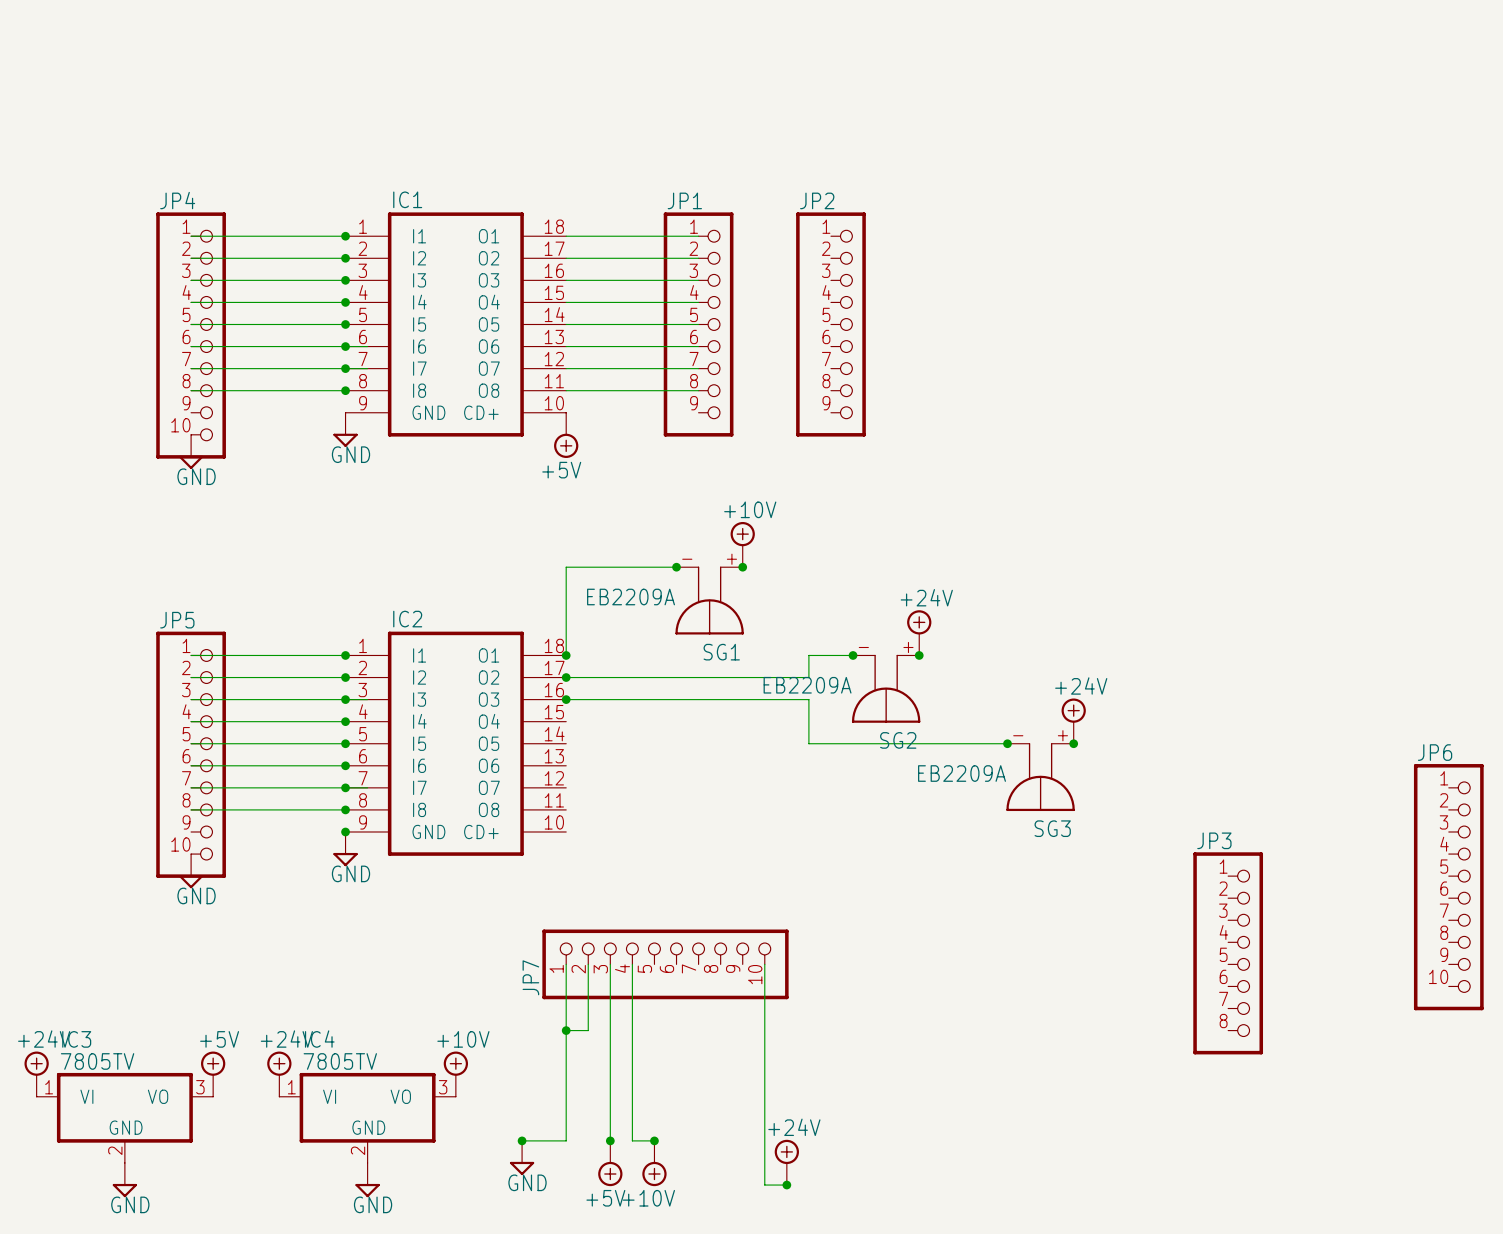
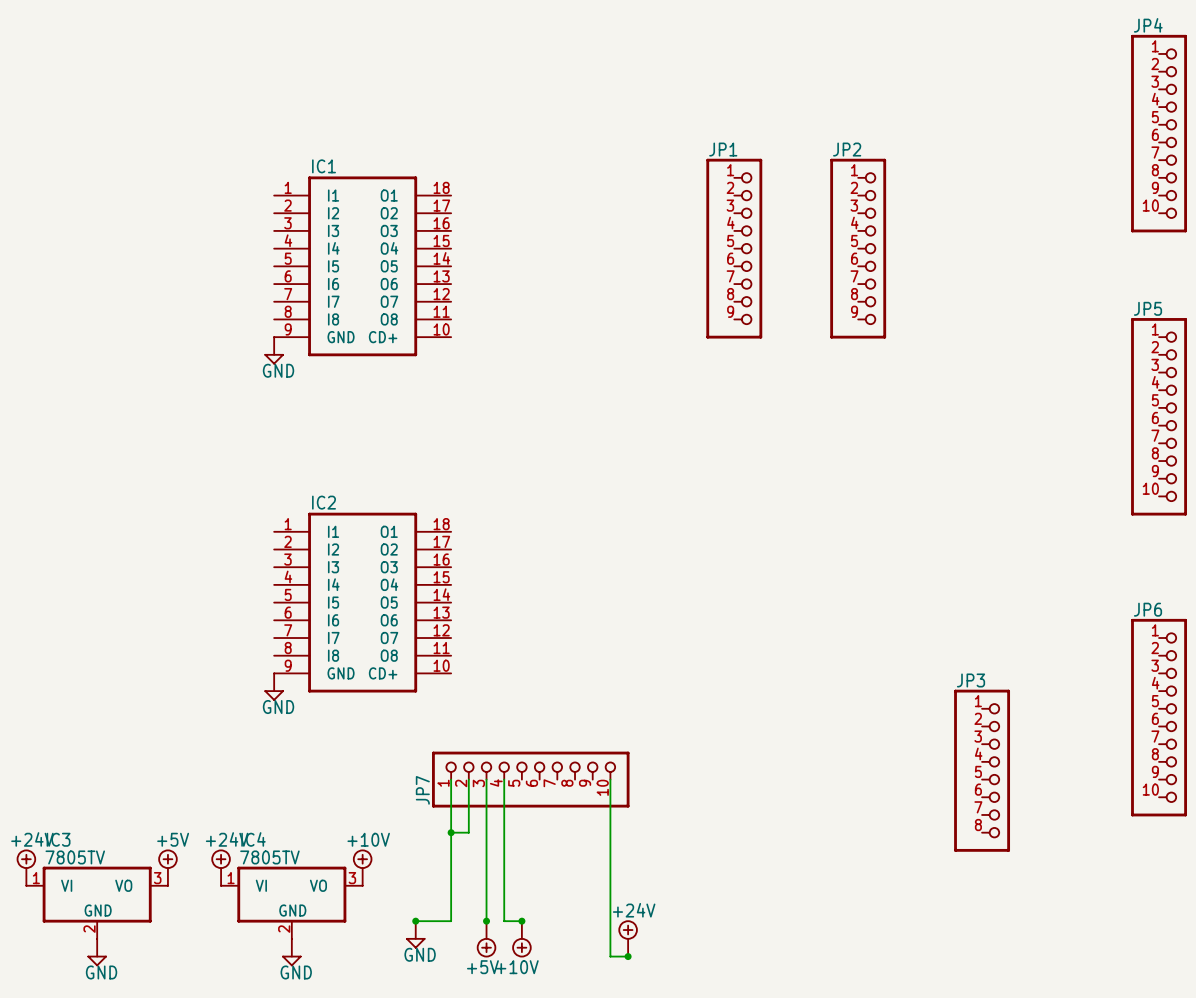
wire: (191, 236) (345, 236) -> none
junction: (345, 236) -> none
wire: (566, 236) (698, 236) -> none
wire: (191, 258) (345, 258) -> none
junction: (345, 258) -> none
wire: (566, 258) (698, 258) -> none
wire: (191, 280) (345, 280) -> none
junction: (345, 280) -> none
wire: (566, 280) (698, 280) -> none
wire: (191, 302) (345, 302) -> none
junction: (345, 302) -> none
wire: (566, 302) (698, 302) -> none
wire: (191, 324) (345, 324) -> none
junction: (345, 324) -> none
wire: (566, 324) (698, 324) -> none
JP1 position: (698, 324) -> (734, 248)
JP2 position: (830, 324) -> (858, 248)
JP4 position: (191, 335) -> (1159, 133)
wire: (191, 346) (367, 346) -> none
junction: (345, 346) -> none
wire: (566, 346) (698, 346) -> none
wire: (191, 368) (367, 368) -> none
junction: (345, 368) -> none
wire: (566, 368) (698, 368) -> none
wire: (191, 390) (345, 390) -> none
junction: (345, 390) -> none
wire: (566, 390) (698, 390) -> none
power symbol: +5V (566, 435) -> none
power symbol: GND (191, 451) -> none
power symbol: +10V (742, 544) -> none
wire: (676, 567) (566, 567) (566, 655) -> none
junction: (676, 567) -> none
junction: (742, 567) -> none
SG1: EB2209A (709, 600) -> none
power symbol: +24V (919, 632) -> none
wire: (191, 655) (345, 655) -> none
junction: (345, 655) -> none
junction: (566, 655) -> none
wire: (853, 655) (808, 655) (808, 677) (566, 677) -> none
junction: (853, 655) -> none
junction: (919, 655) -> none
wire: (191, 677) (345, 677) -> none
junction: (345, 677) -> none
junction: (566, 677) -> none
SG2: EB2209A (886, 688) -> none
wire: (191, 699) (367, 699) -> none
junction: (345, 699) -> none
wire: (566, 699) (808, 699) (808, 743) (1007, 743) -> none
junction: (566, 699) -> none
wire: (191, 721) (345, 721) -> none
junction: (345, 721) -> none
power symbol: +24V (1073, 721) -> none
wire: (191, 743) (345, 743) -> none
junction: (345, 743) -> none
junction: (1007, 743) -> none
junction: (1073, 743) -> none
JP5 position: (191, 754) -> (1159, 416)
wire: (191, 765) (345, 765) -> none
junction: (345, 765) -> none
SG3: EB2209A (1040, 777) -> none
wire: (191, 787) (367, 787) -> none
junction: (345, 787) -> none
wire: (191, 809) (345, 809) -> none
junction: (345, 809) -> none
junction: (345, 831) -> none
power symbol: GND (191, 871) -> none

